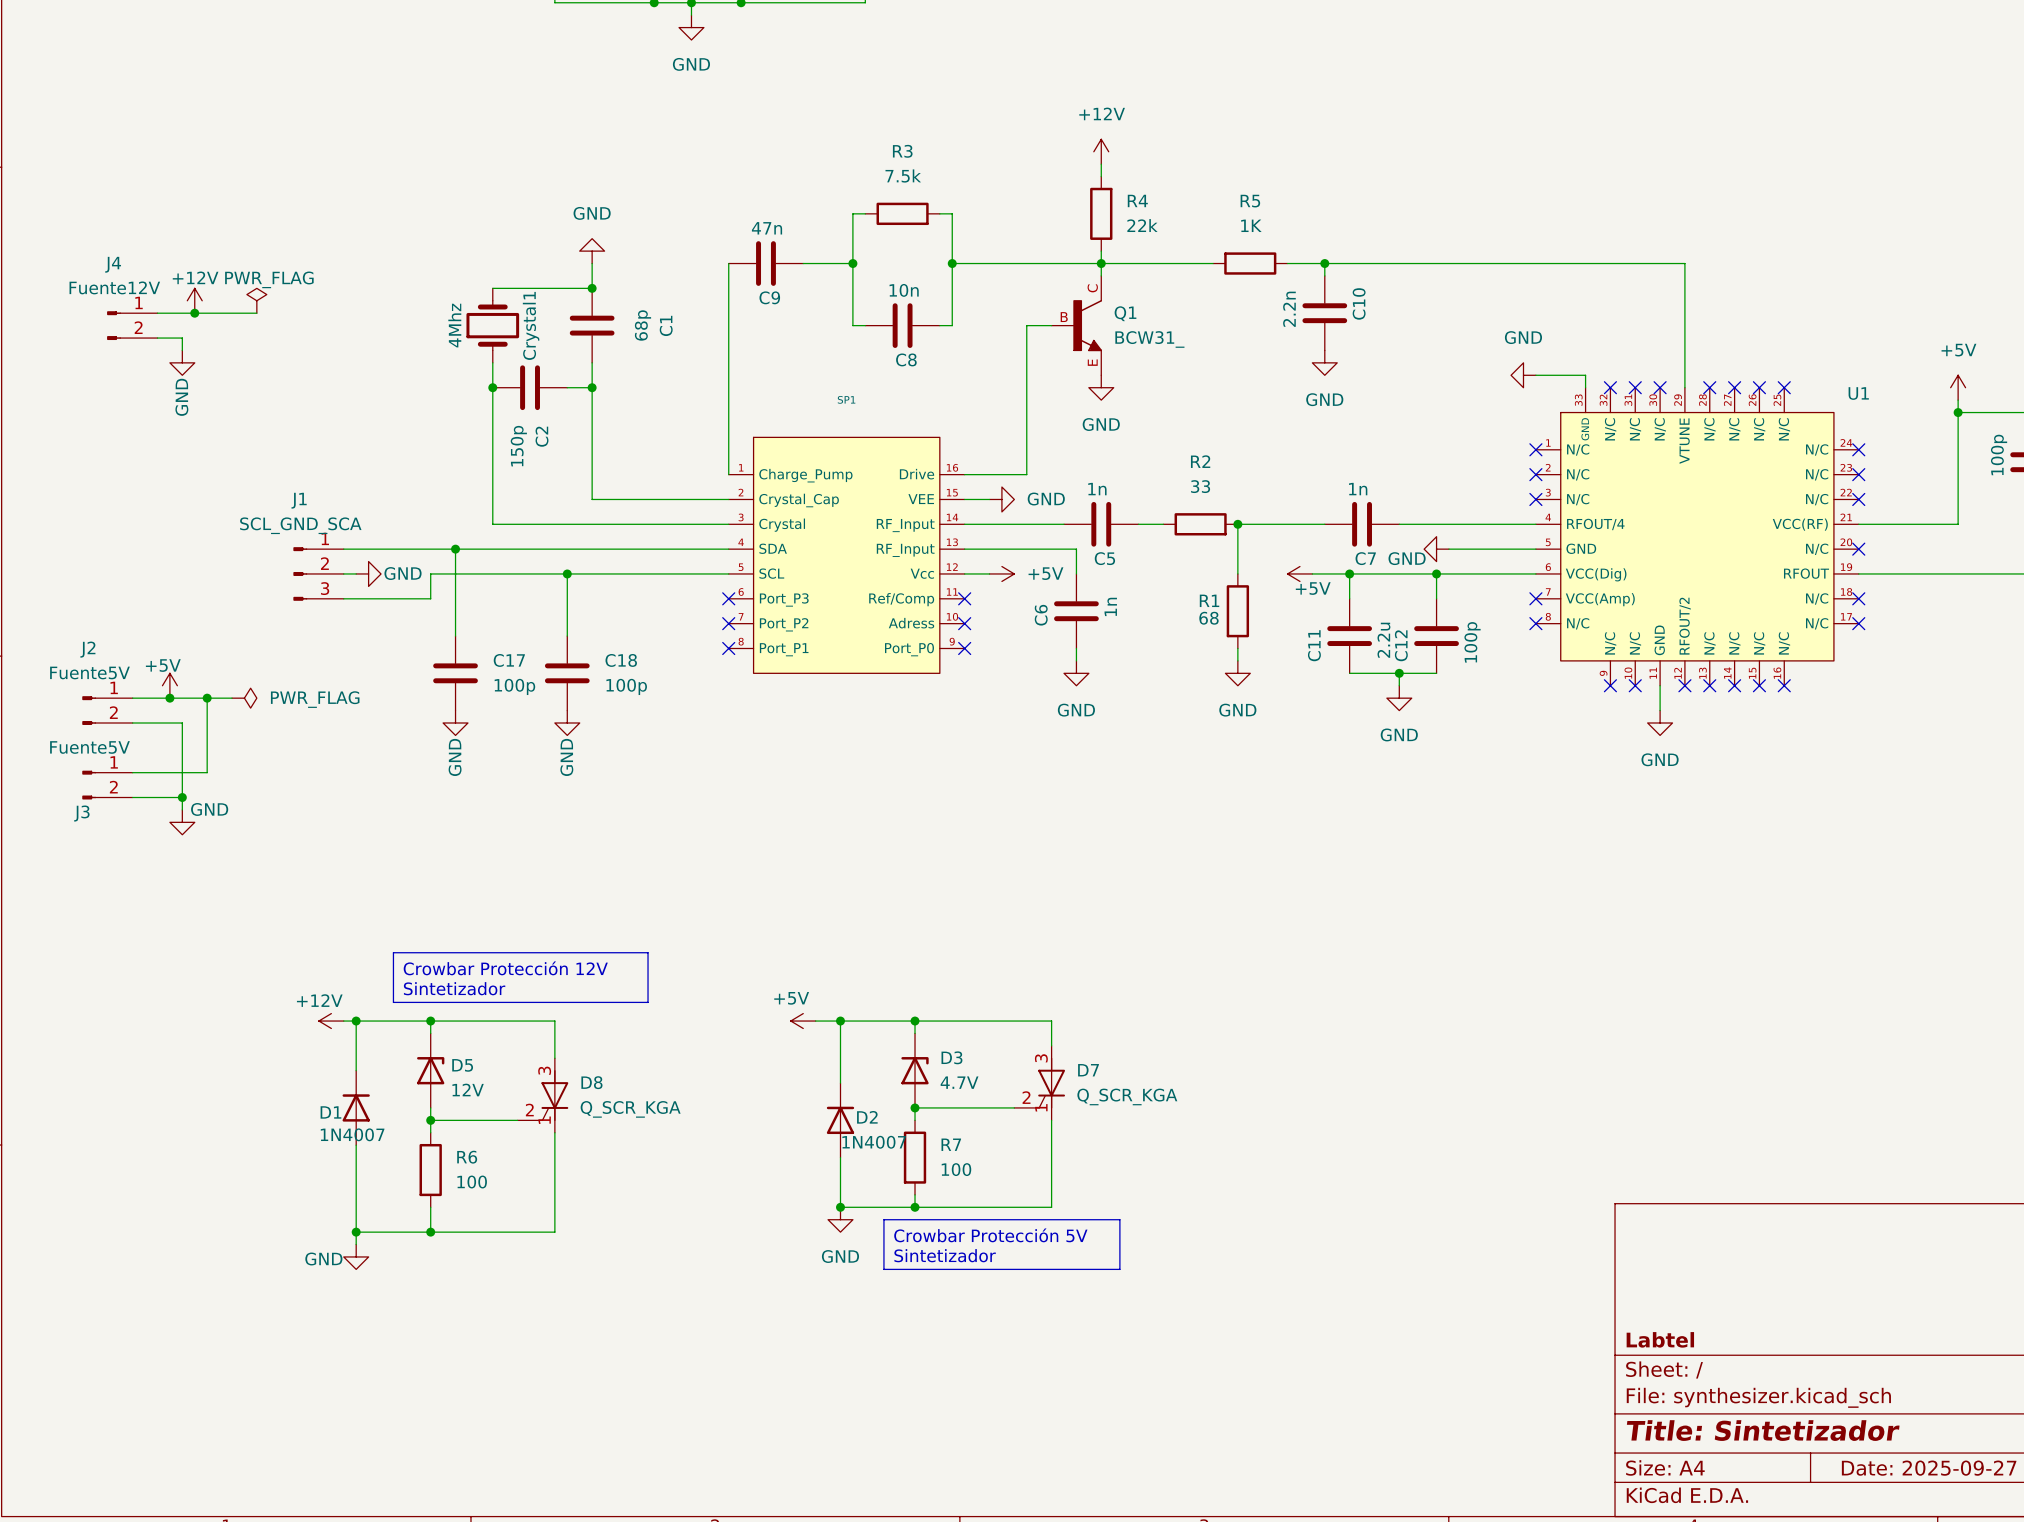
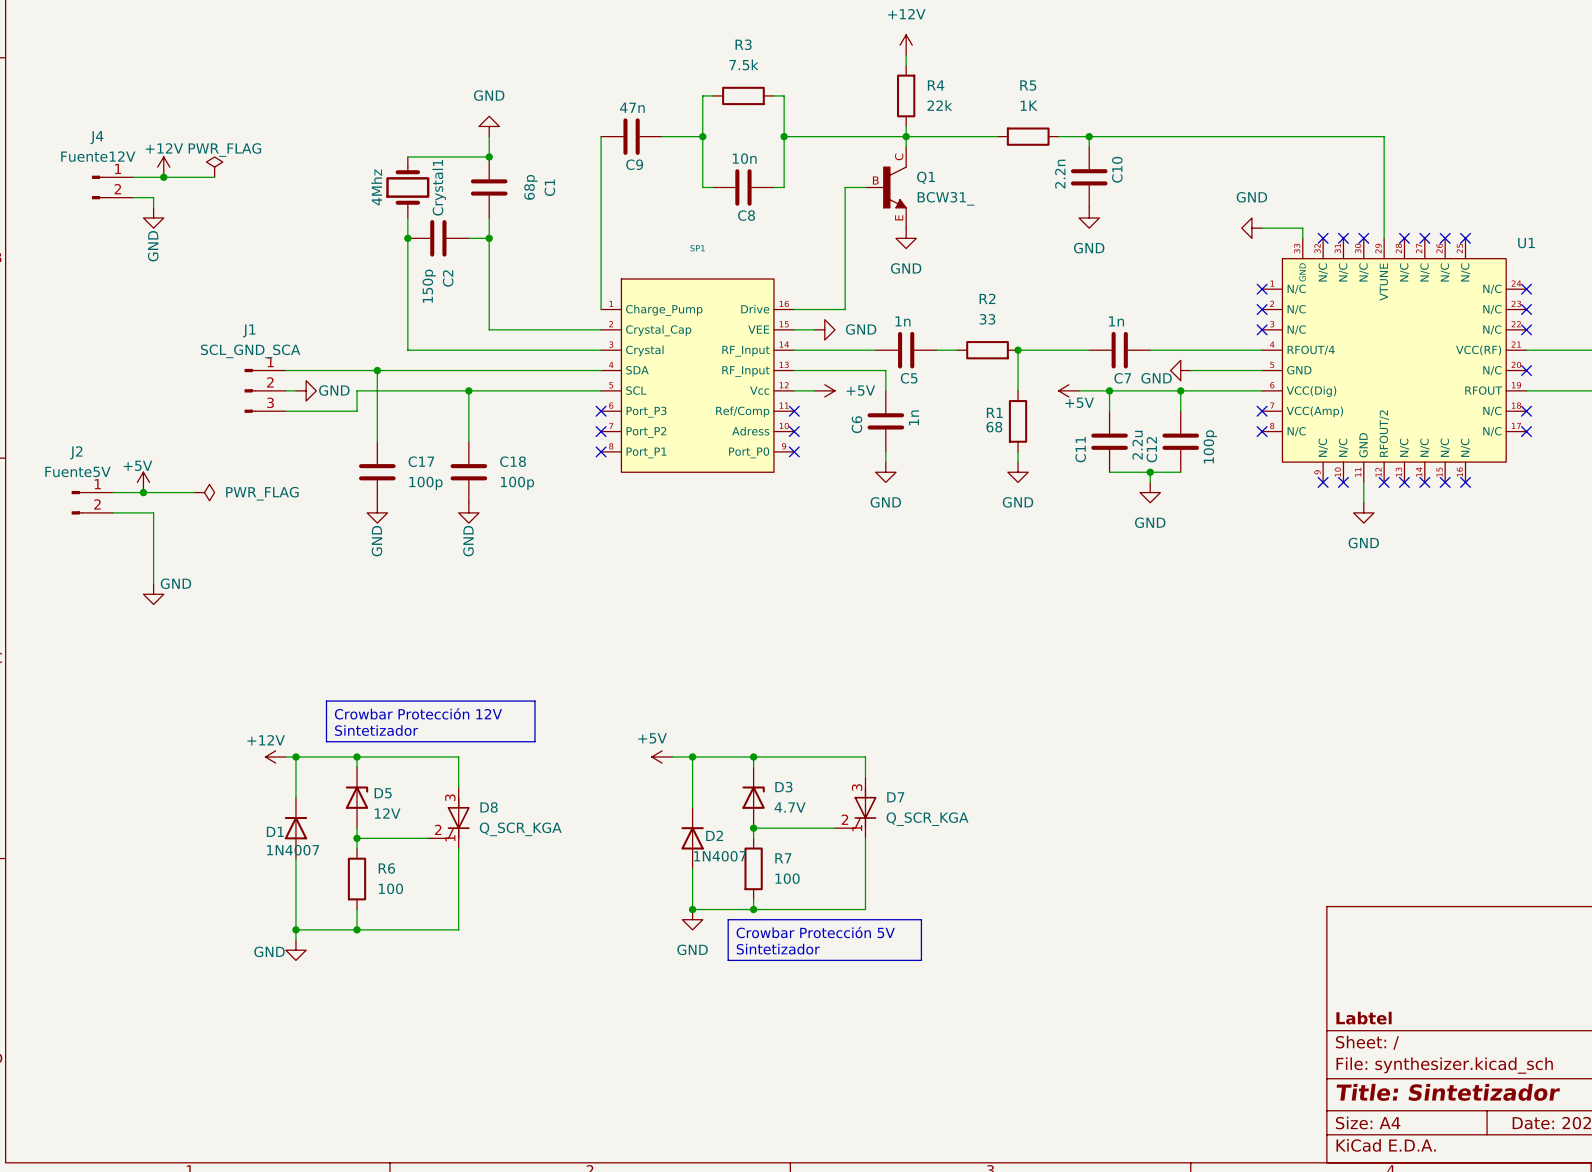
wire: (207, 698) (207, 772) (132, 772) -> none
junction: (207, 698) -> none
J3: Fuente5V (107, 785) -> none
wire: (132, 797) (182, 797) -> none
junction: (182, 797) -> none

